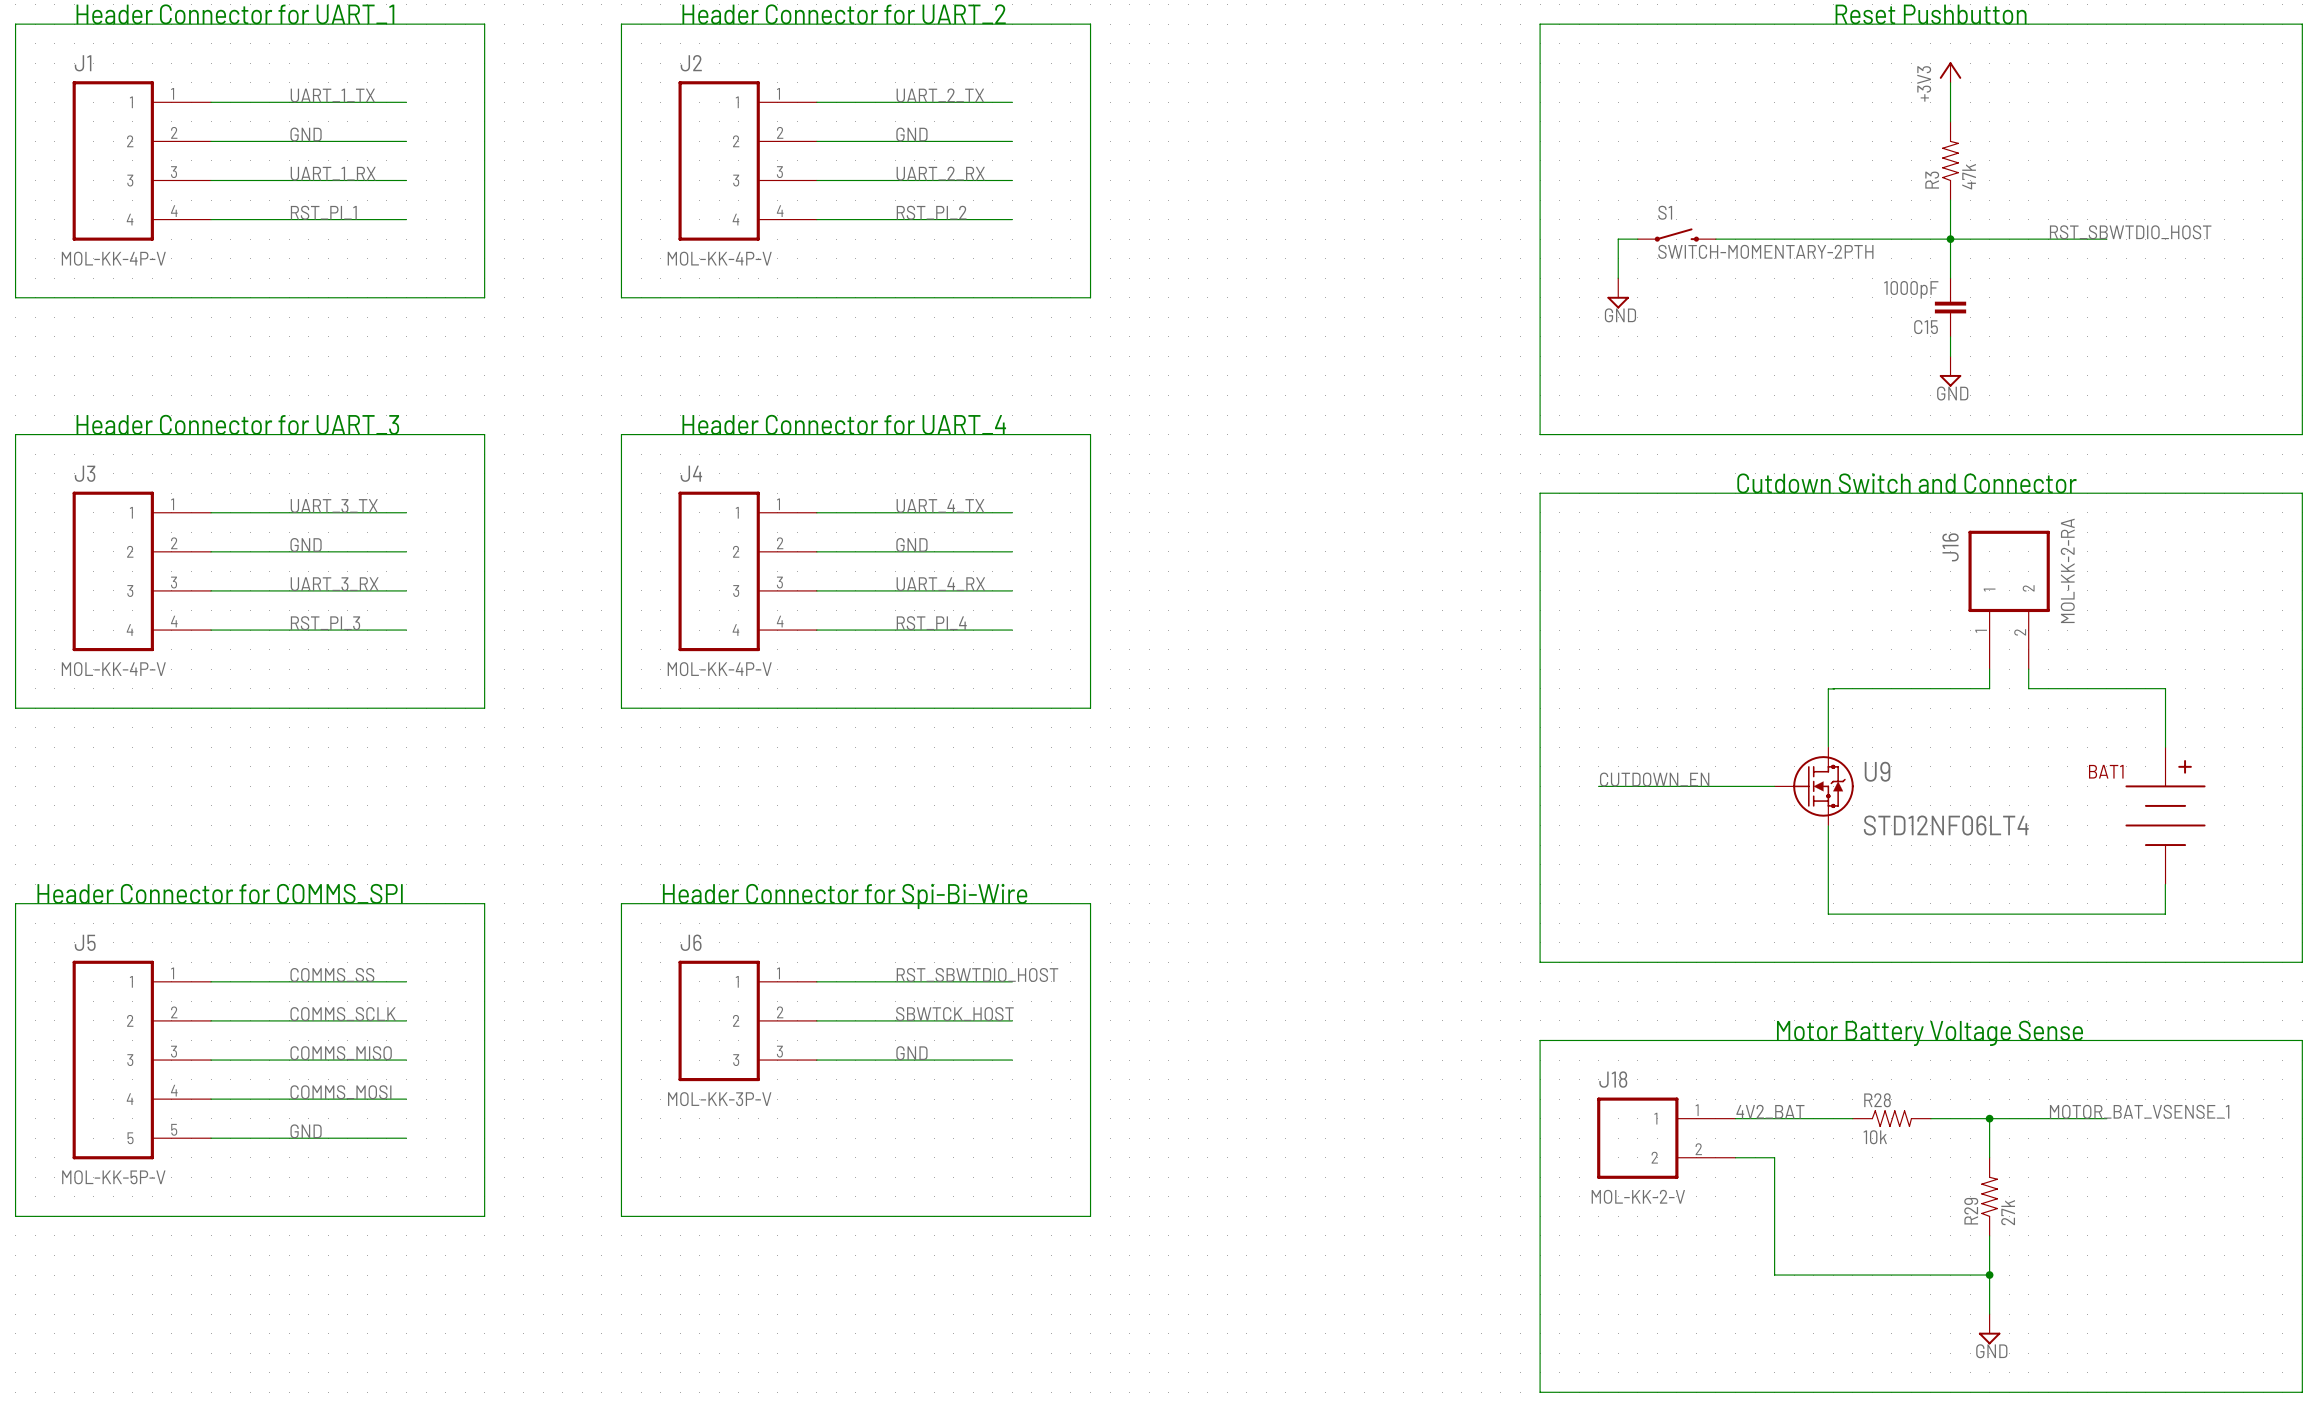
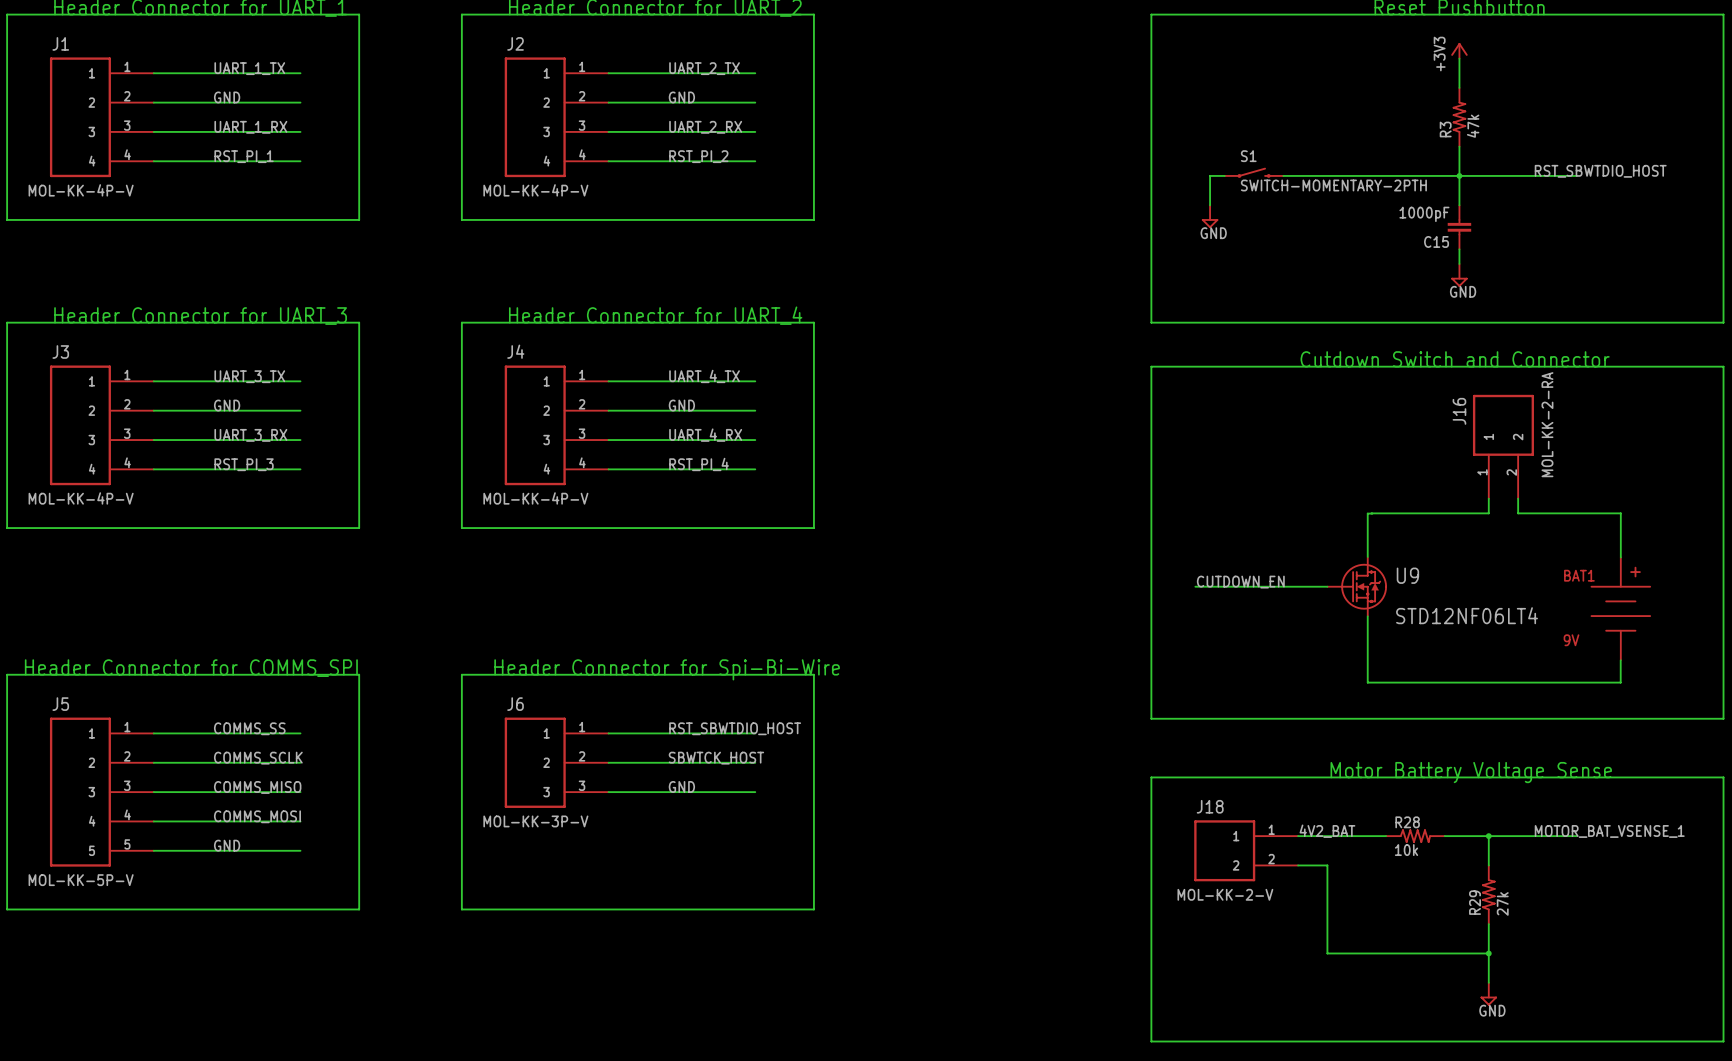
BAT1 value: none -> 9V (1571, 640)

